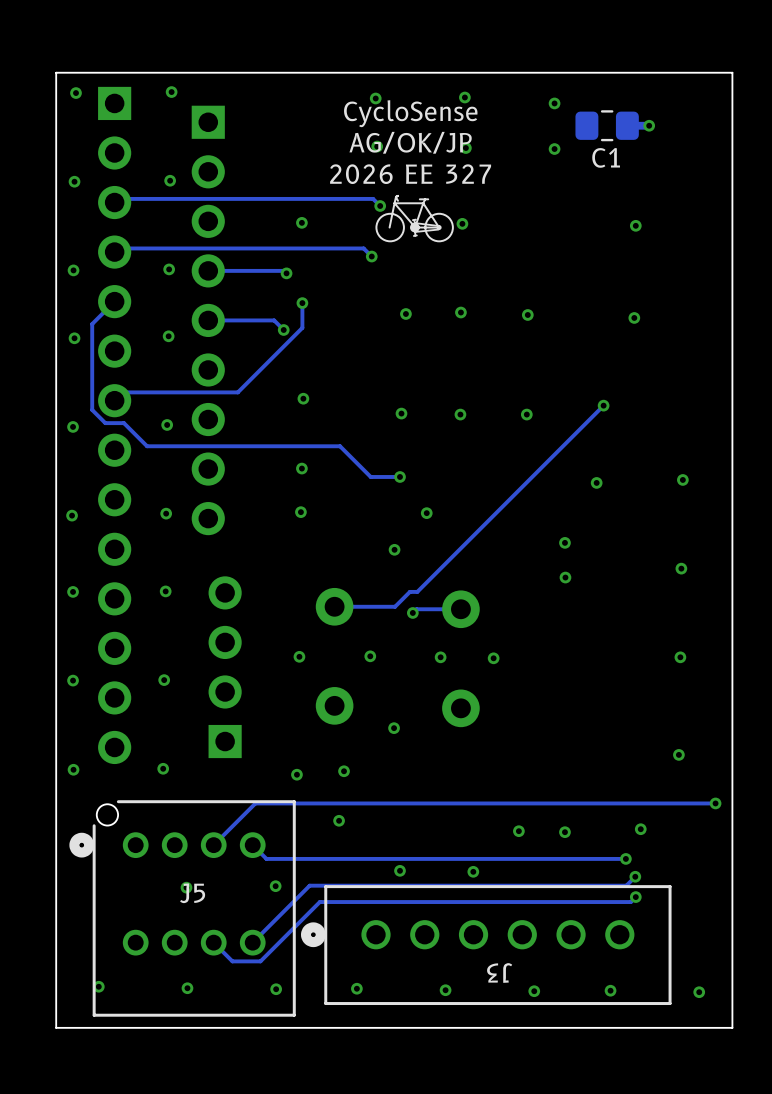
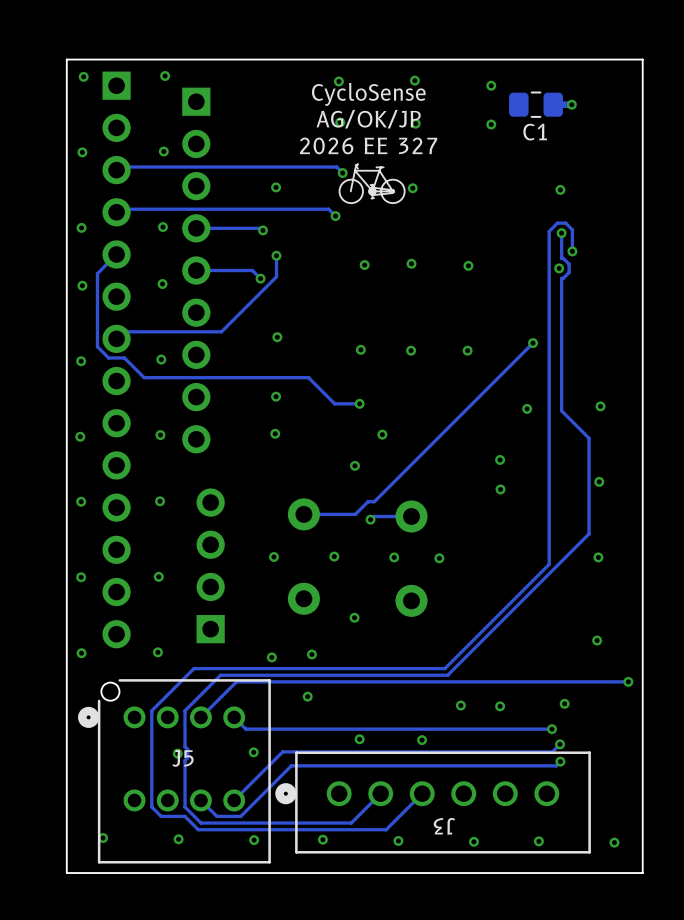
track: none -> (561, 233) (561, 258) (569, 264) (569, 272) (561, 278) (561, 410) (589, 438) (589, 533) (447, 675) (220, 675) (185, 710) (185, 746) (187, 749) (187, 757) (185, 760) (185, 807) (201, 823) (351, 823) (380, 793)
via: none -> (561, 233)
track: none -> (572, 251) (572, 229) (565, 223) (557, 223) (549, 231) (549, 564) (444, 668) (193, 668) (151, 710) (151, 807) (161, 816) (184, 816) (198, 829) (386, 829) (422, 793)
via: none -> (572, 251)

